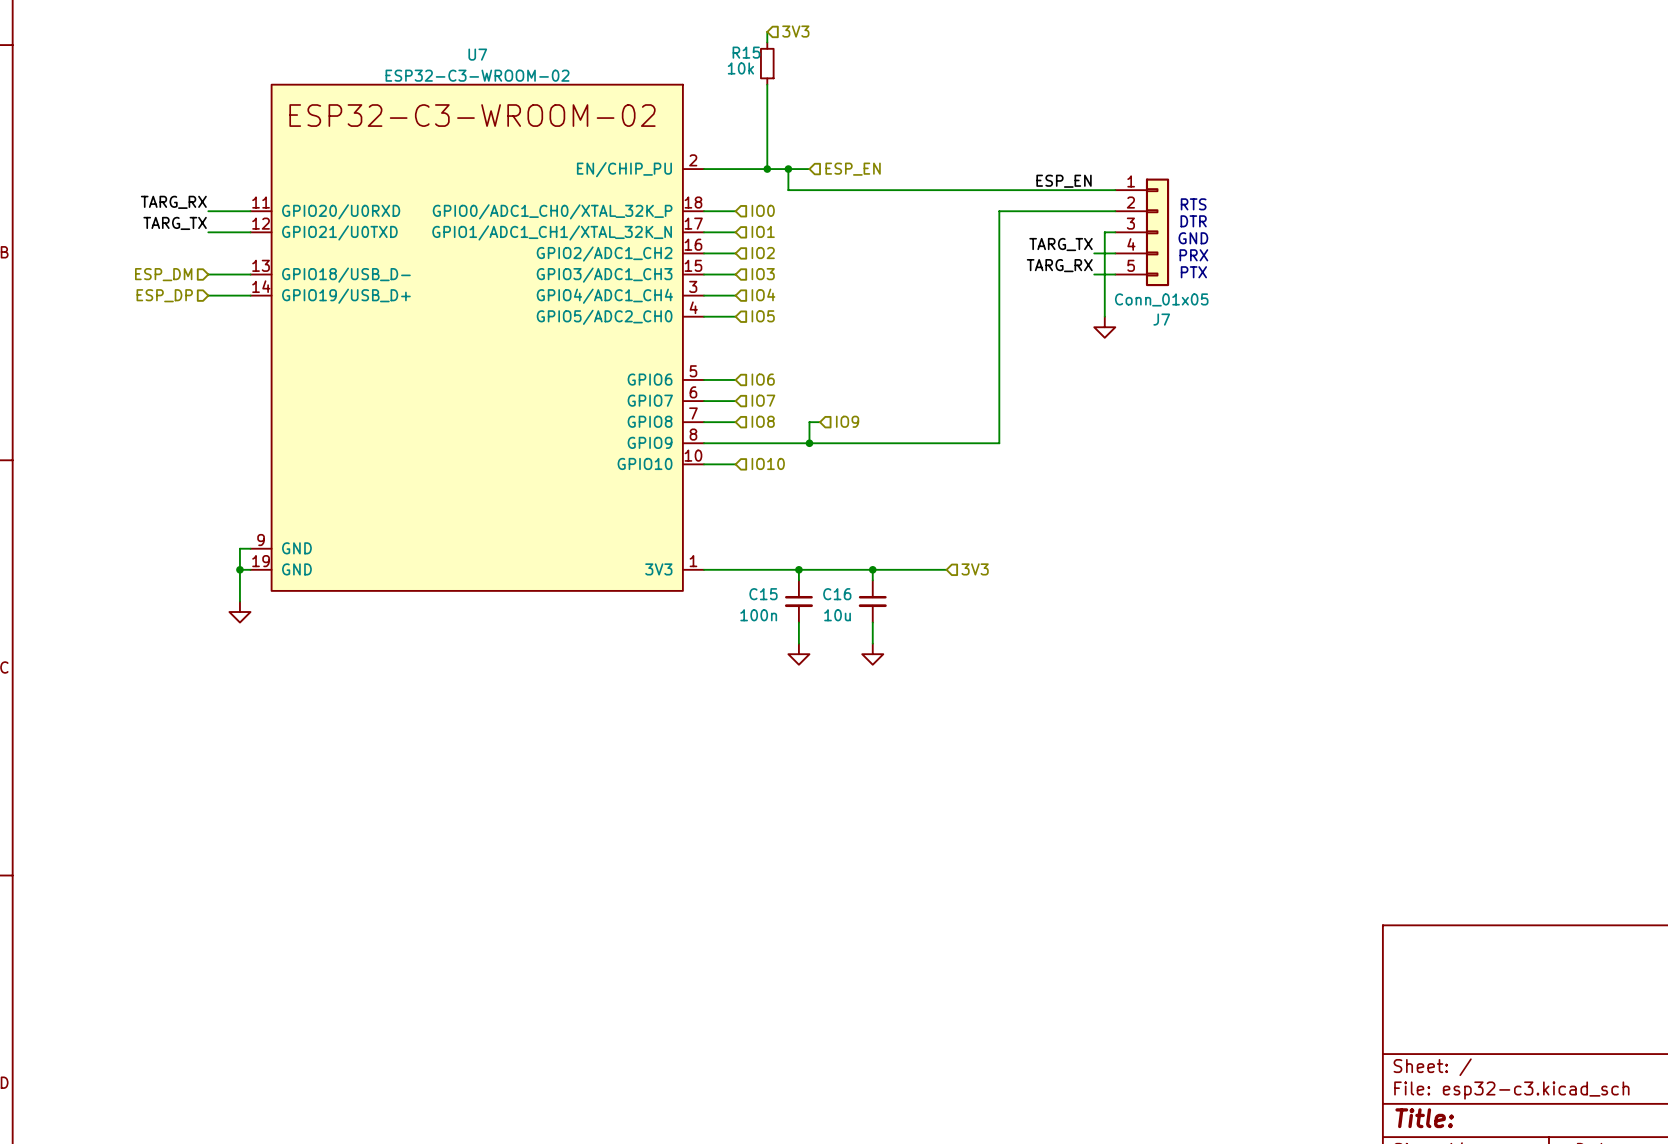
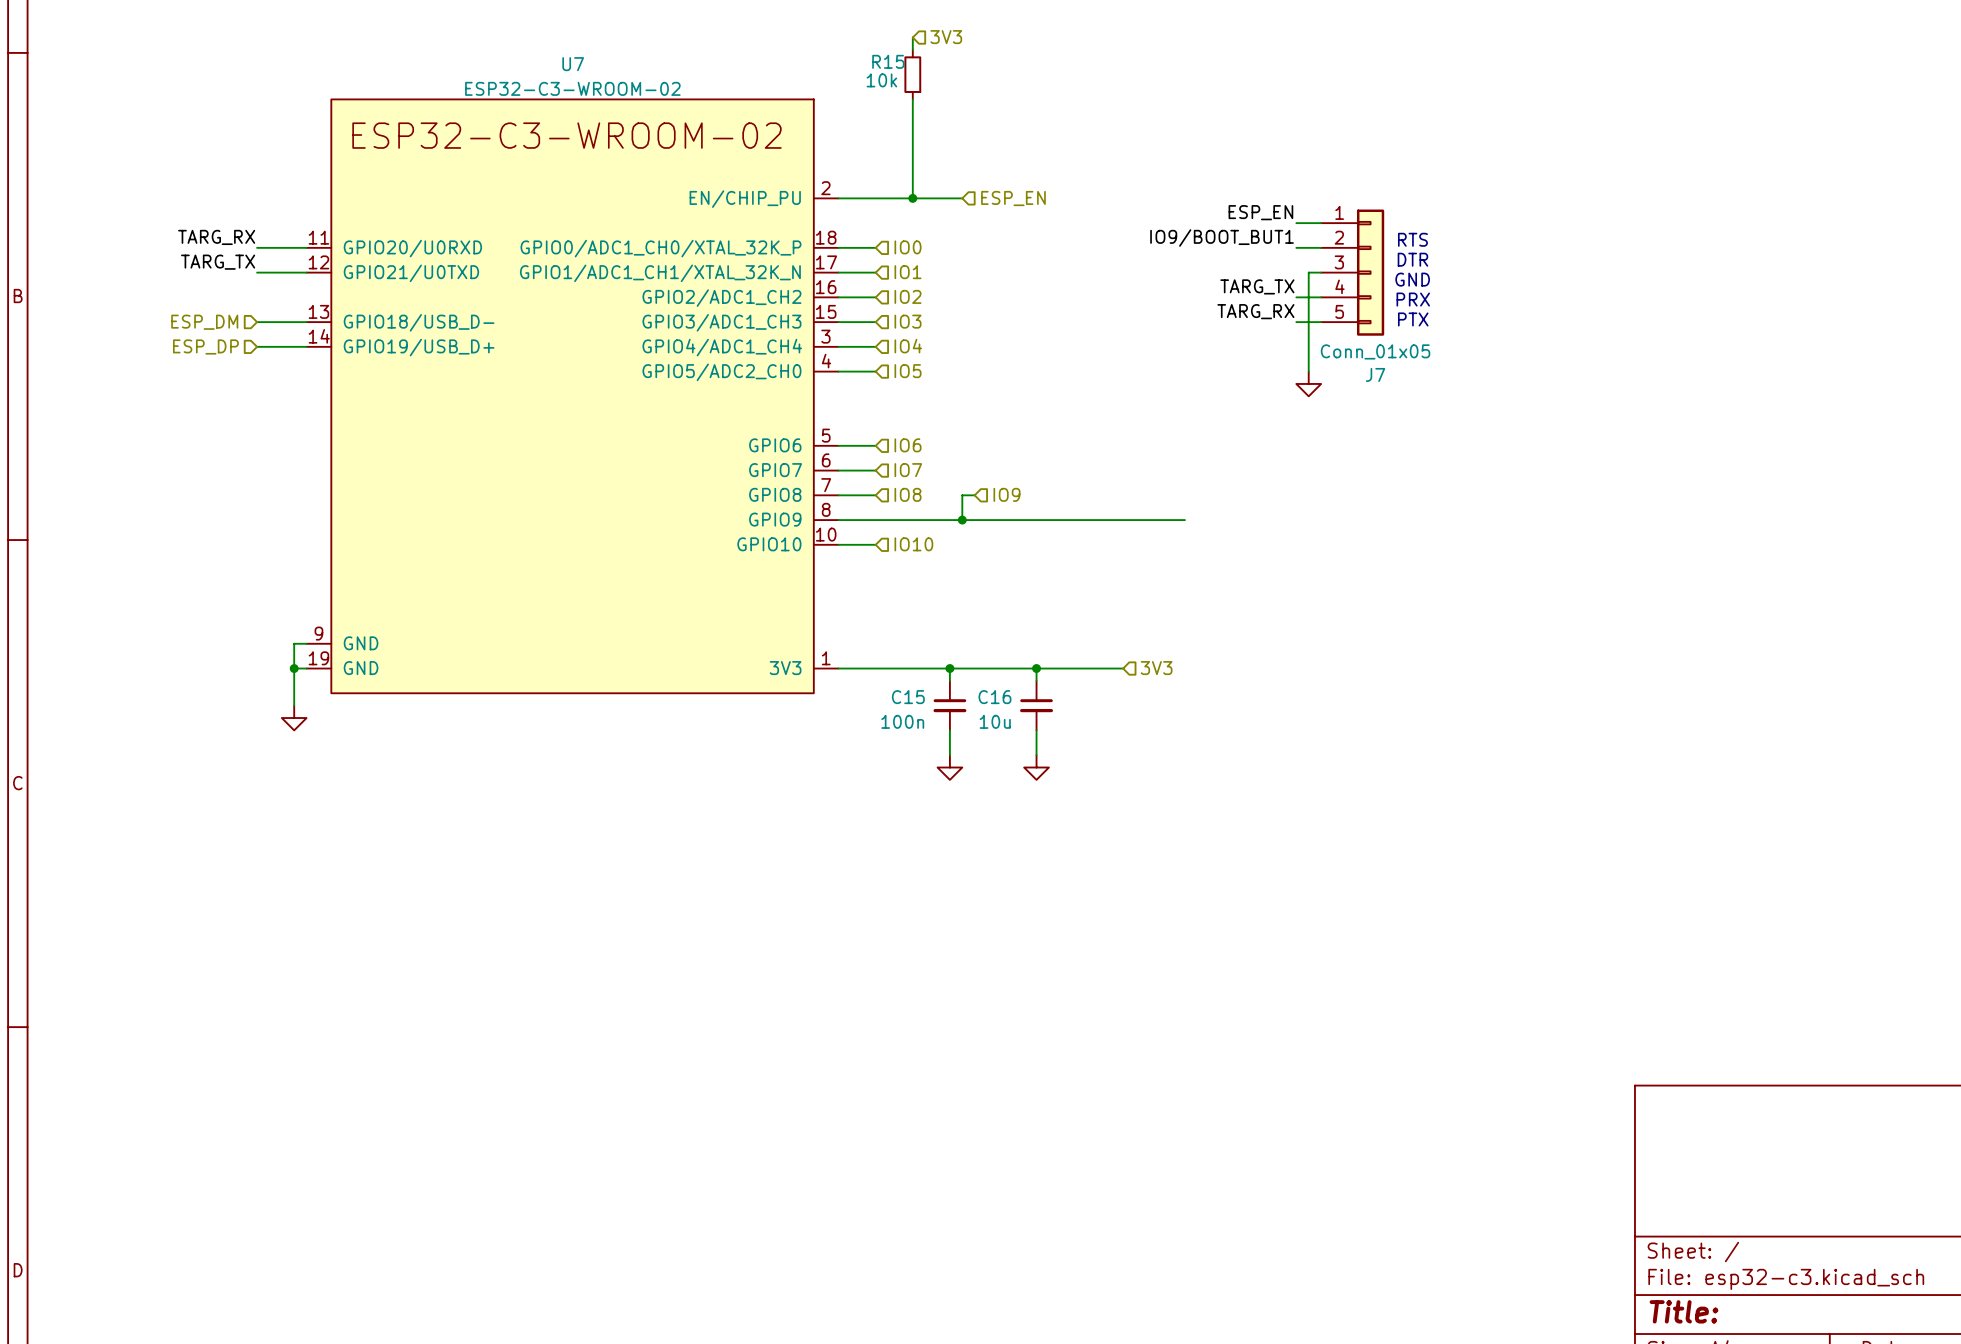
wire: (788, 169) (788, 190) (1094, 190) -> none
junction: (788, 169) -> none
label: none -> IO9/BOOT_BUT1 (1222, 238)
wire: (1094, 211) (999, 211) (999, 443) -> none

